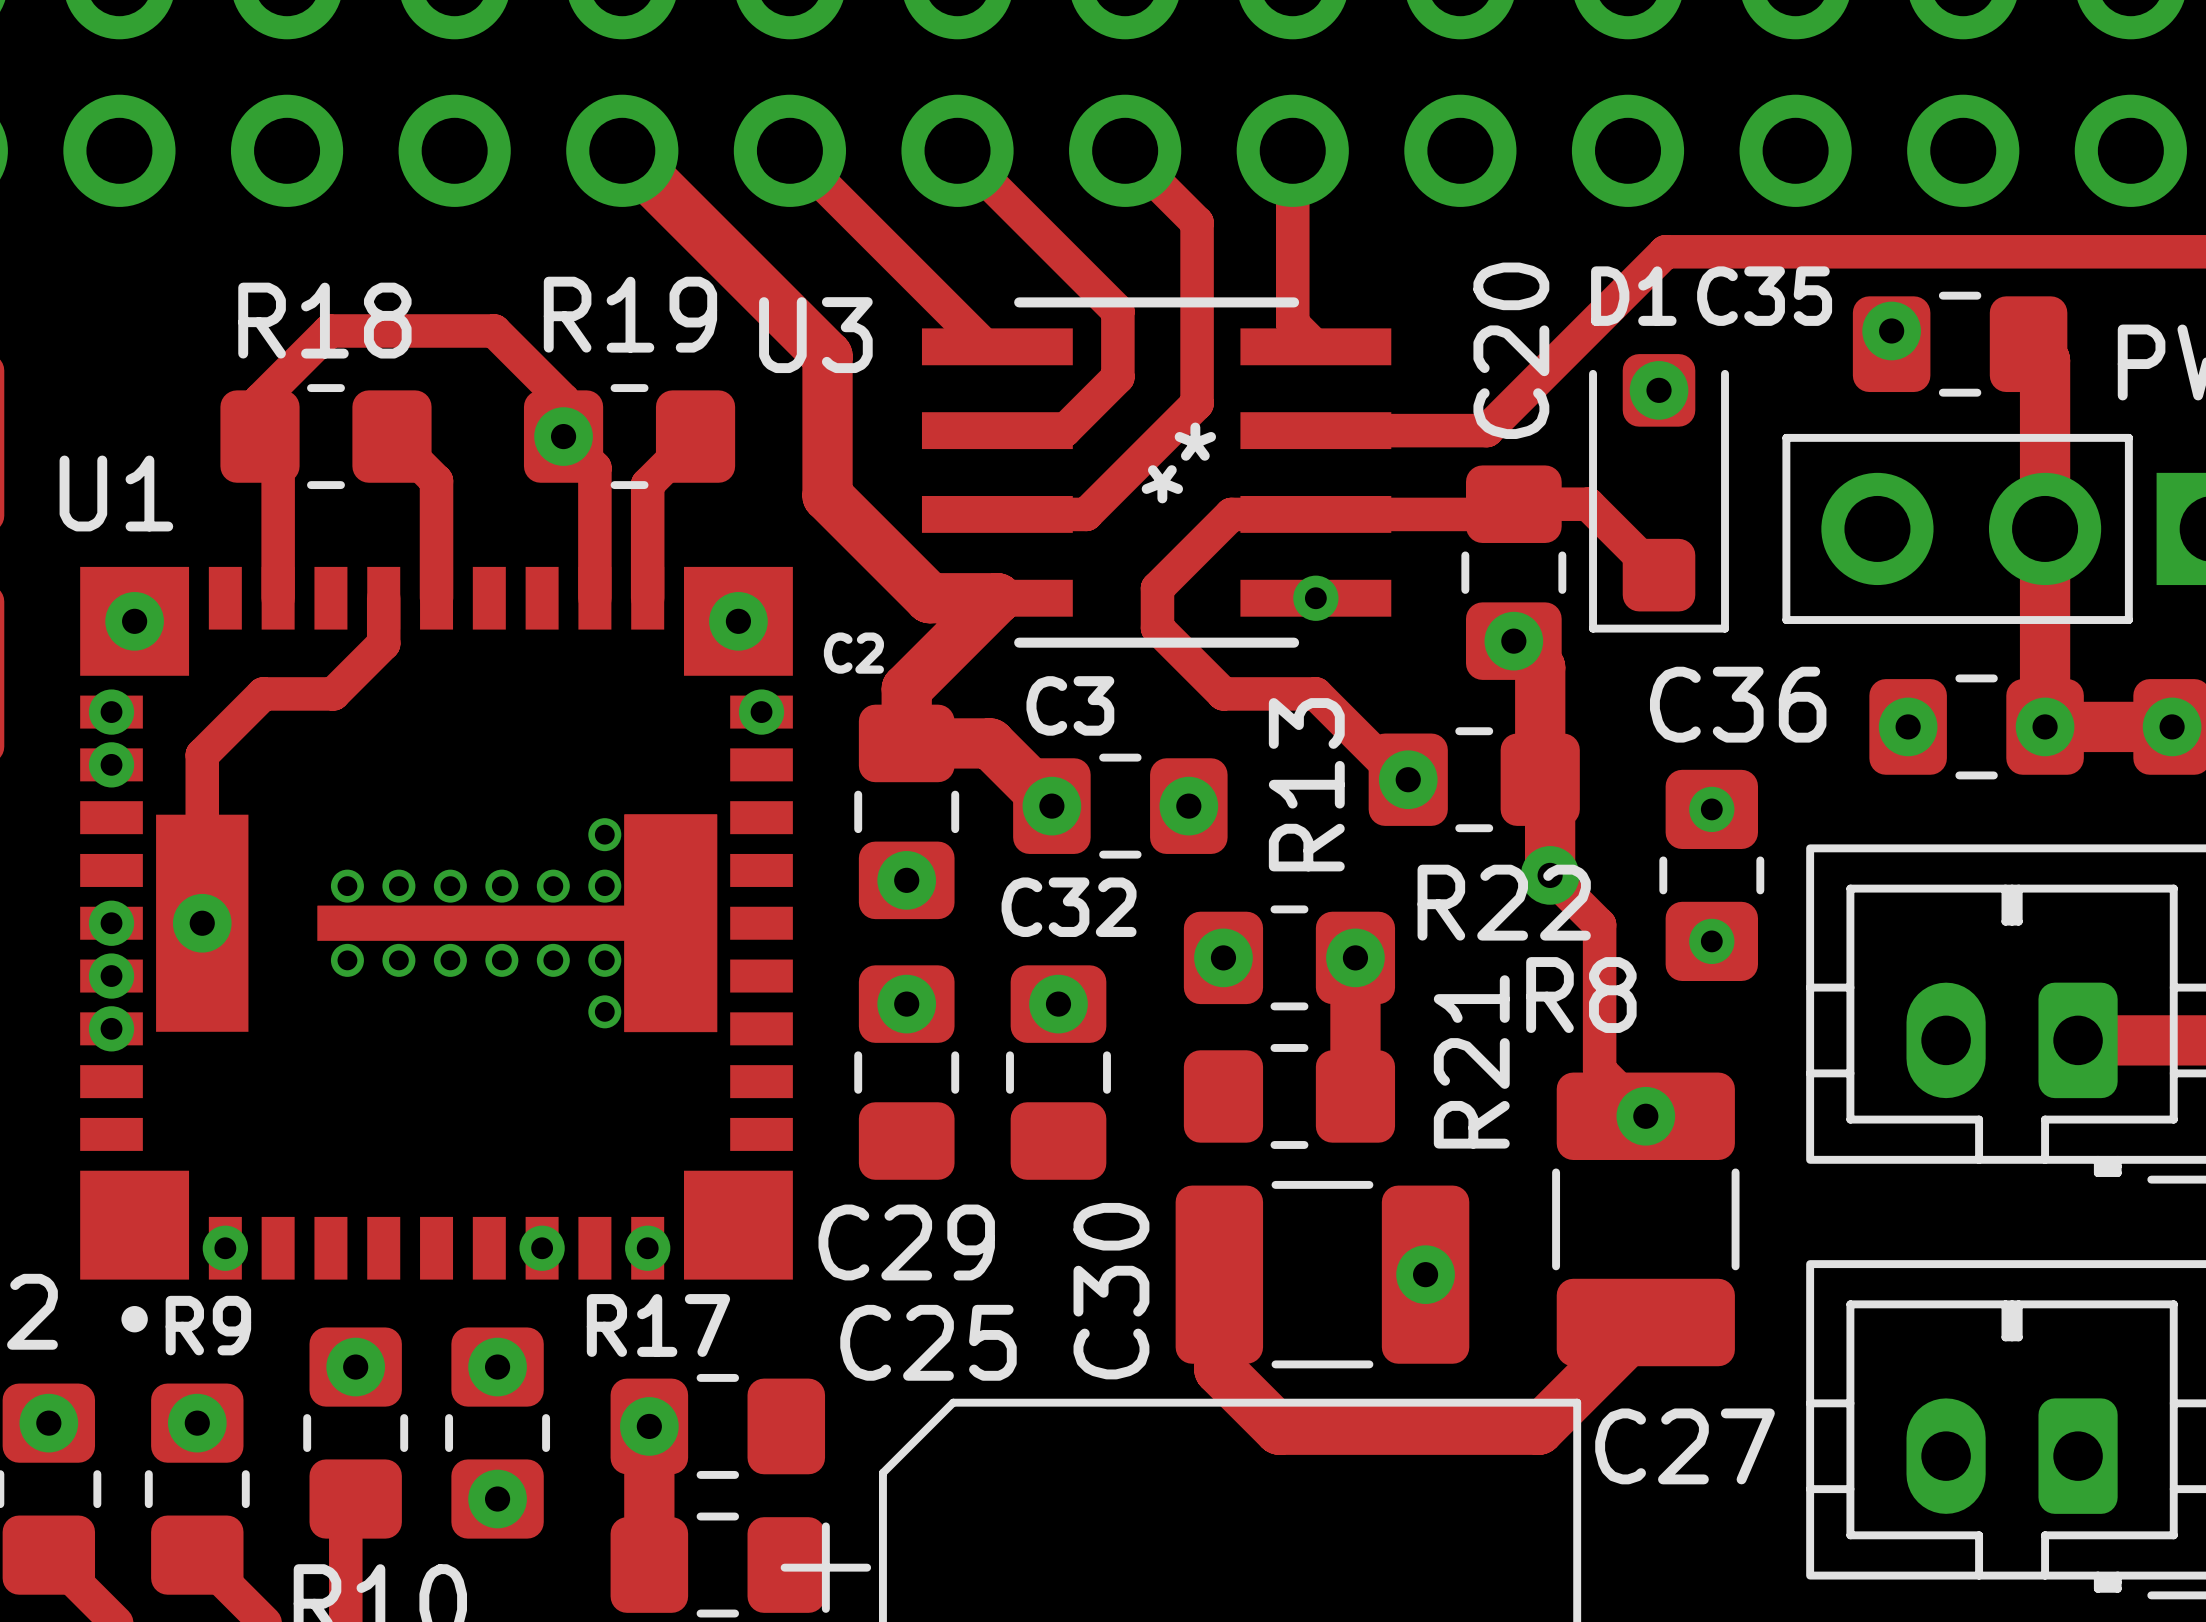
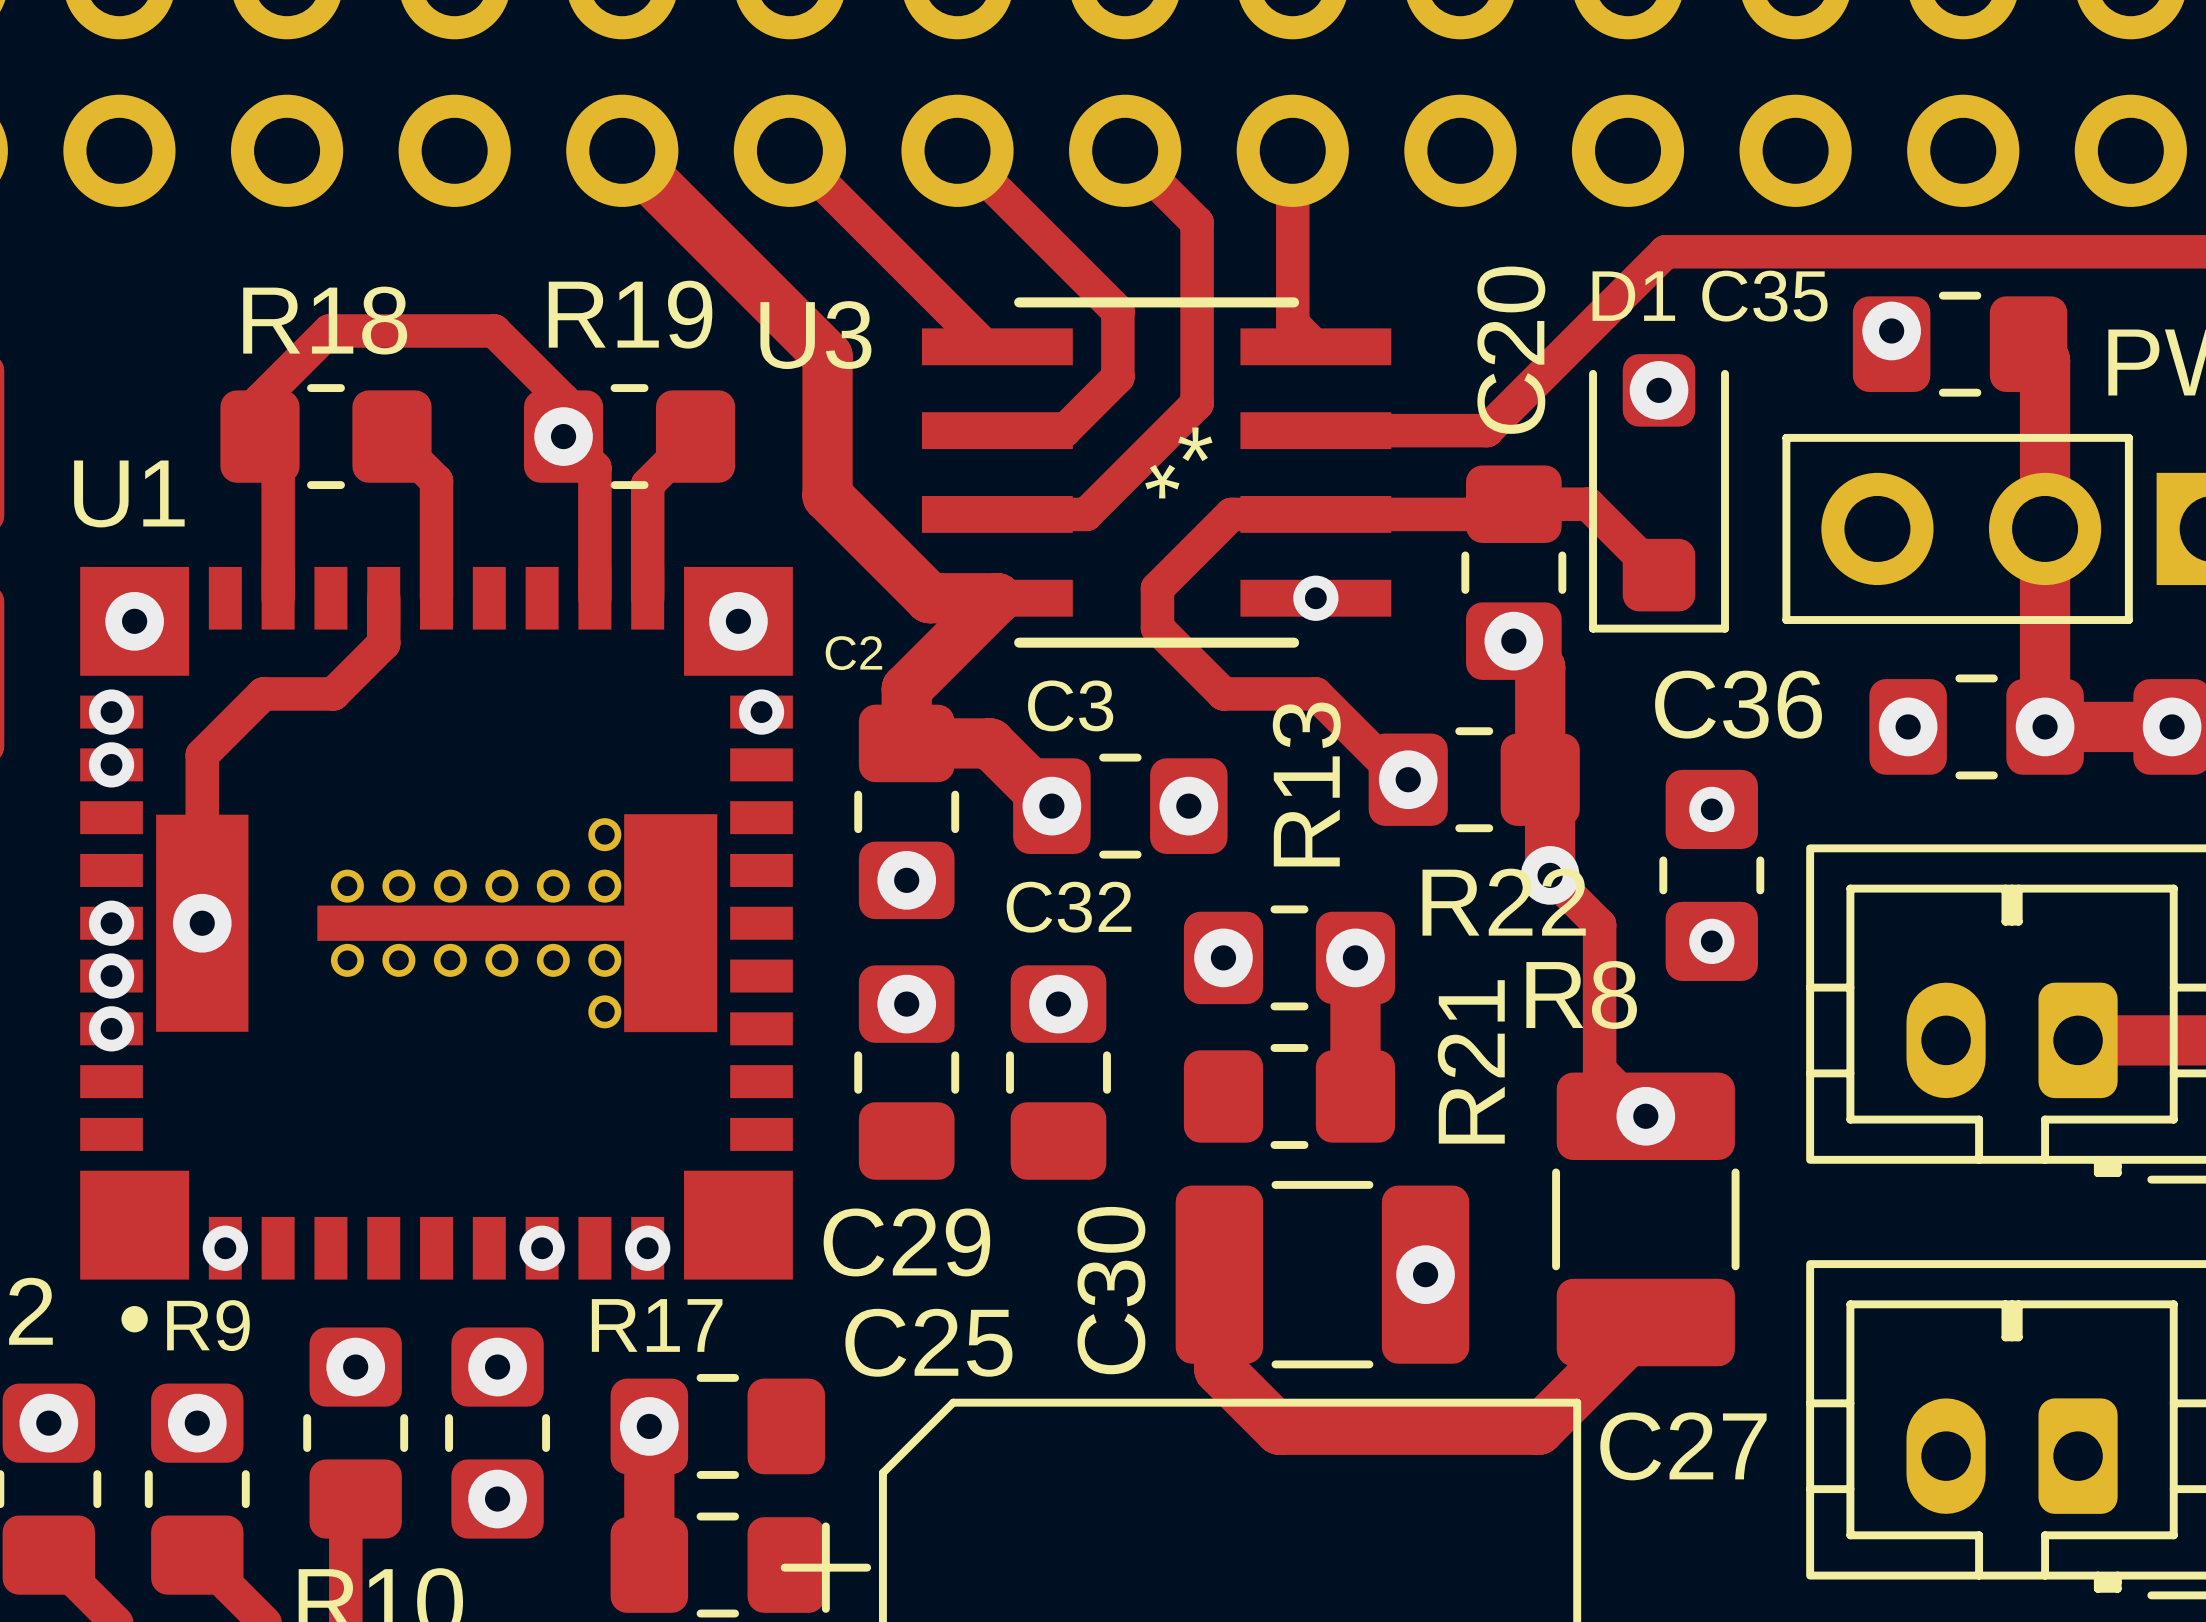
U1 name position: U1 (116, 493) -> U1 (129, 493)

